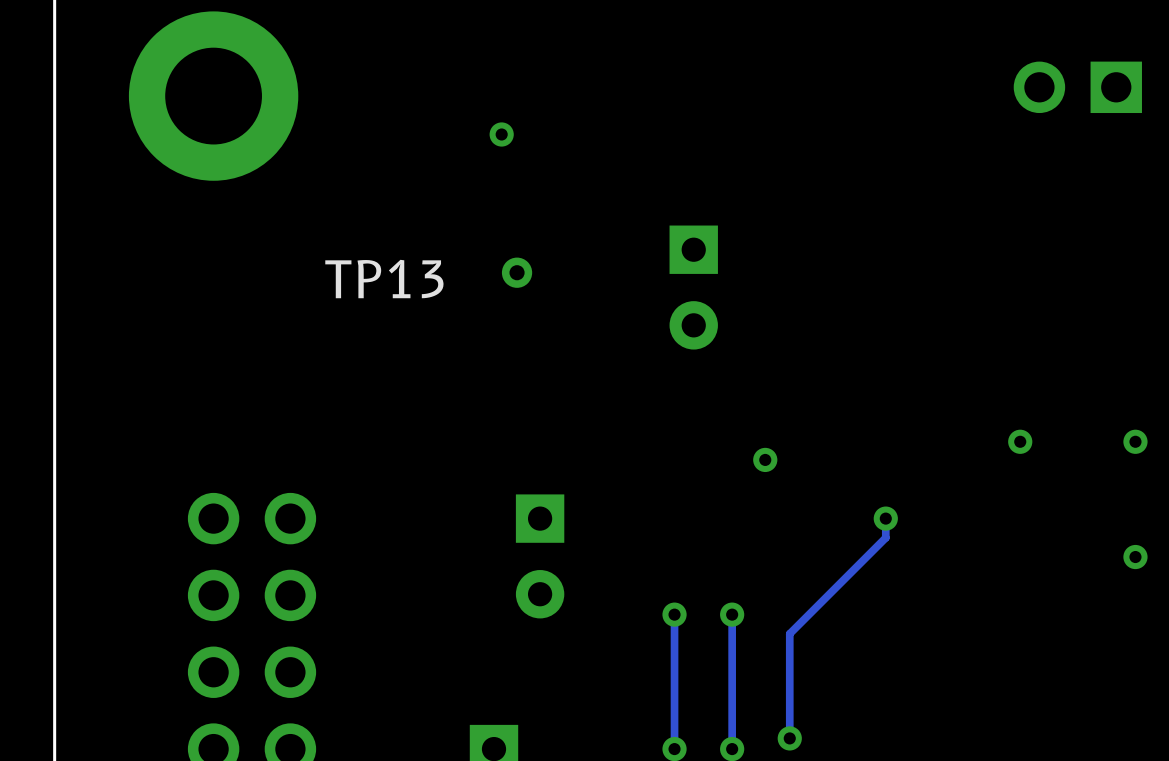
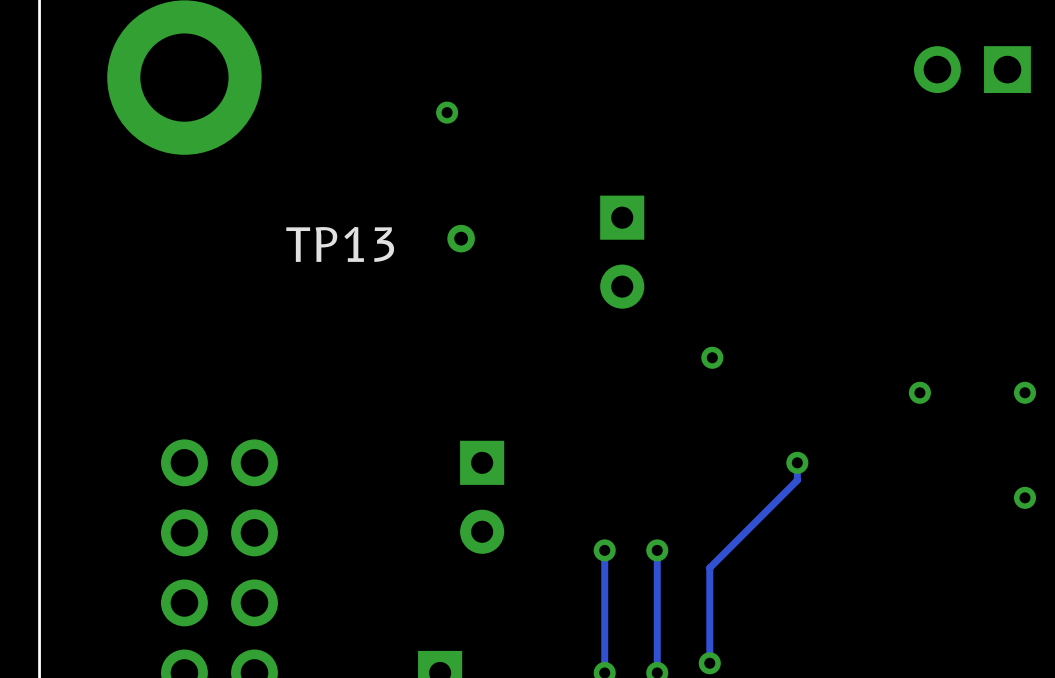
via position: (765, 459) -> (712, 357)

